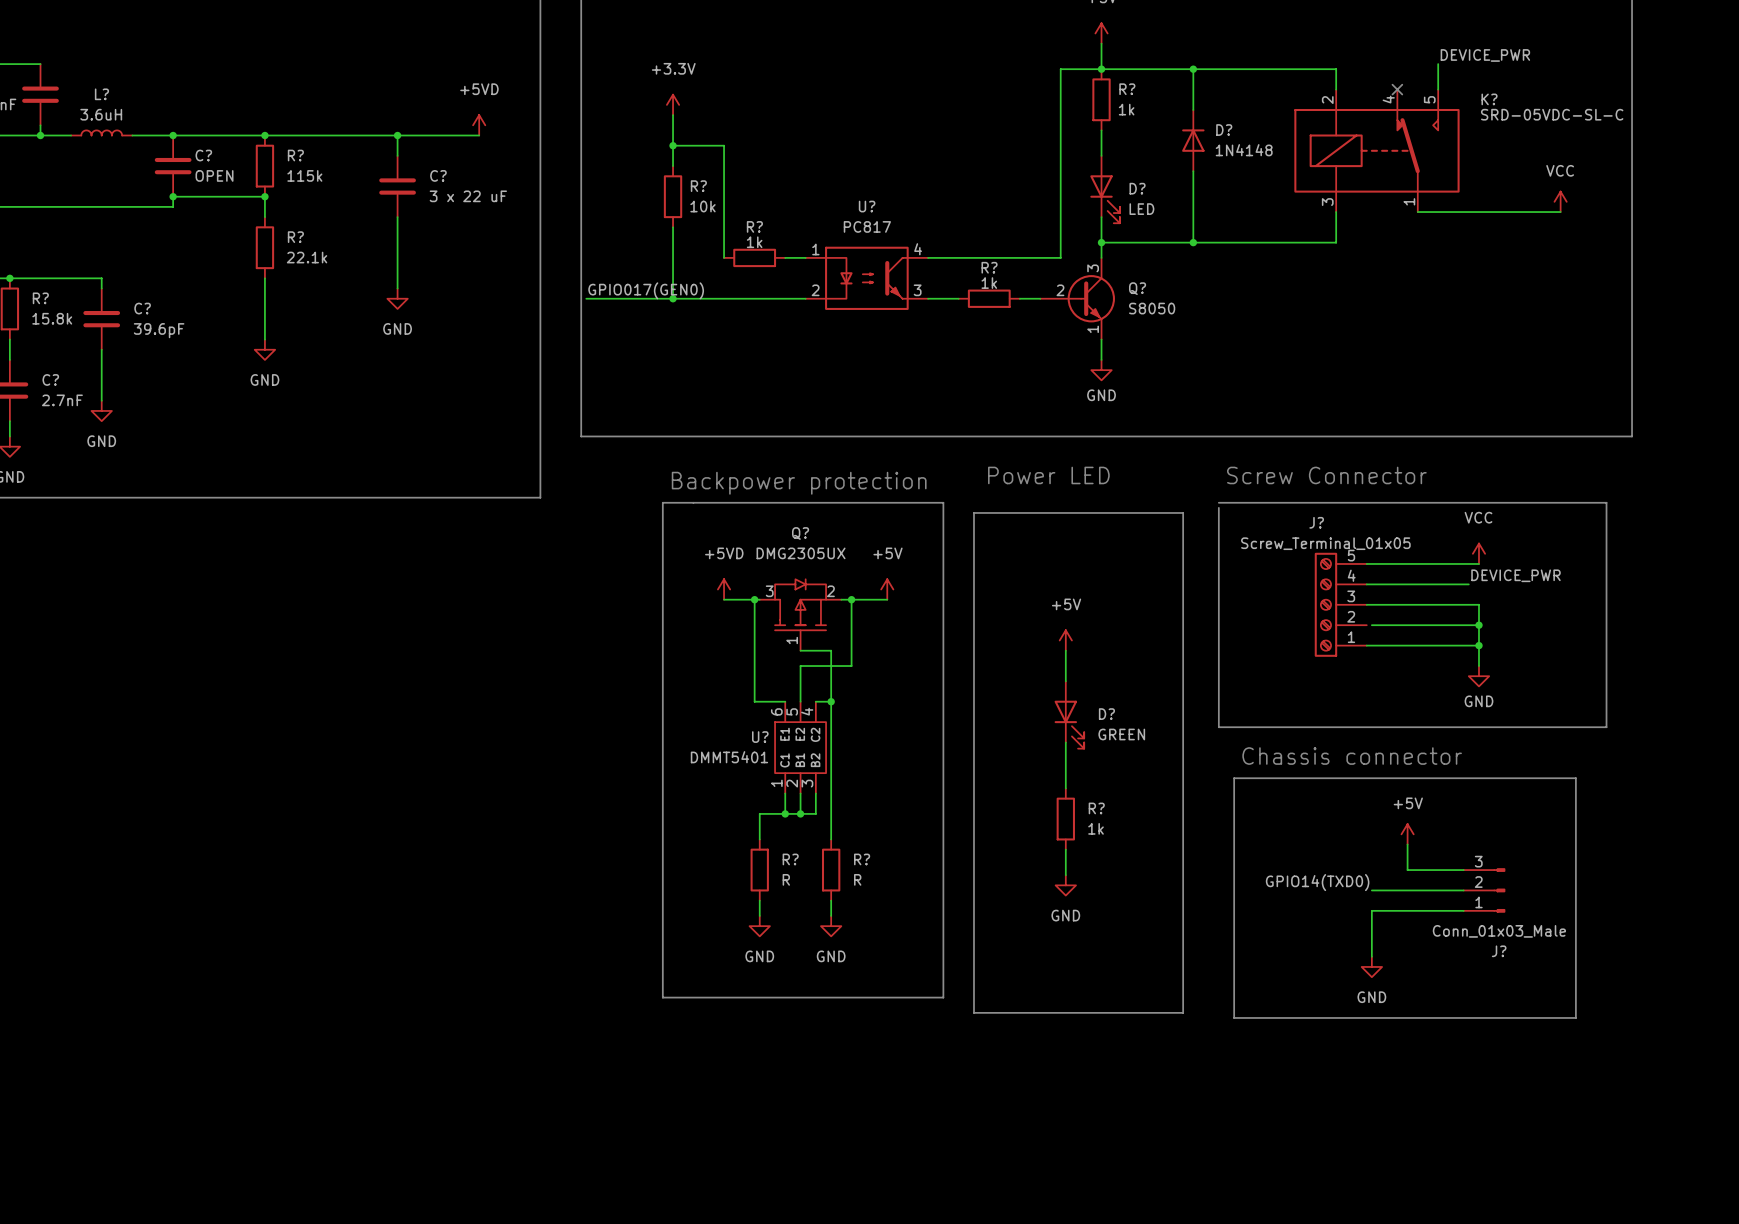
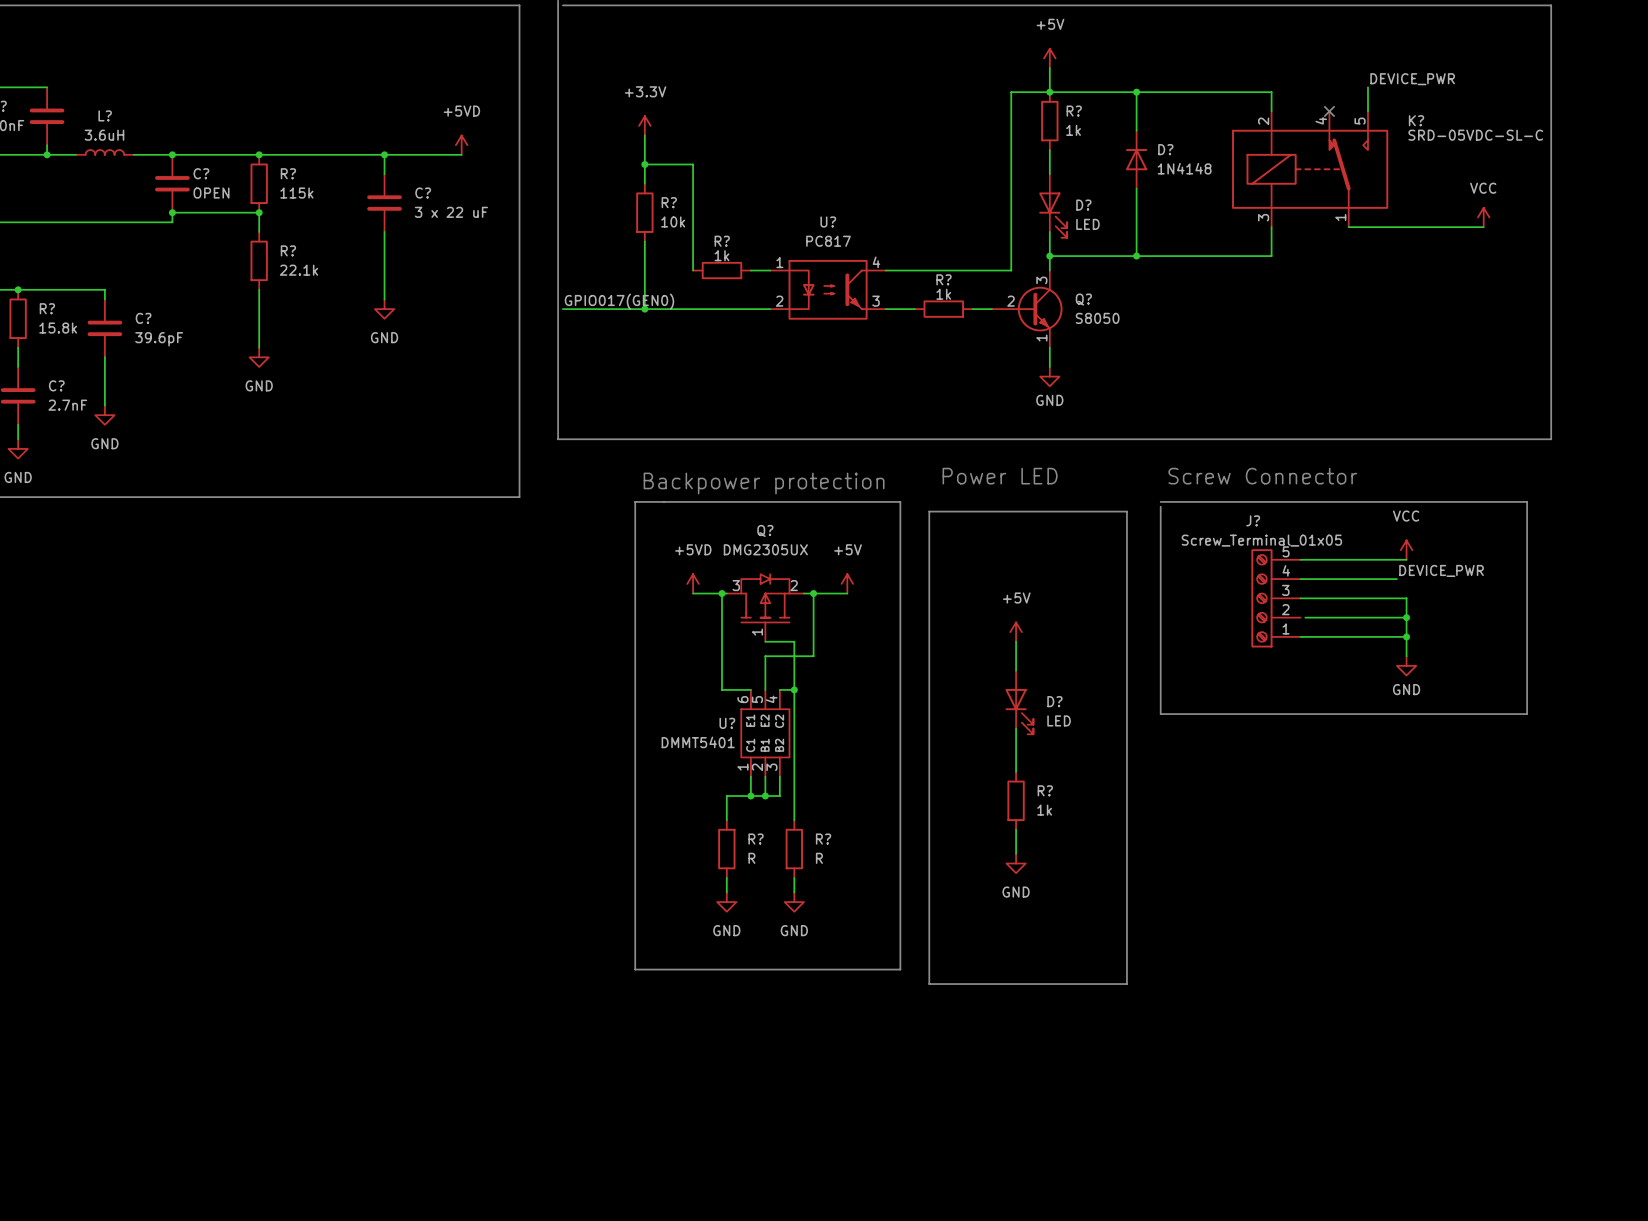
D? value: GREEN (1121, 734) -> LED (1059, 720)
text: Chassis connector (1352, 756) -> none
line: (1234, 778) (1234, 1017) (1575, 1017) (1575, 778) (1234, 778) -> none
power symbol: +5V (1407, 834) -> none
wire: (1407, 844) (1407, 870) (1463, 870) -> none
label: GPIO14(TXD0) (1317, 882) -> none
wire: (1371, 890) (1463, 890) -> none
J?: Conn_01x03_Male (1484, 890) -> none
wire: (1463, 910) (1371, 910) (1371, 956) -> none
power symbol: GND (1371, 966) -> none

